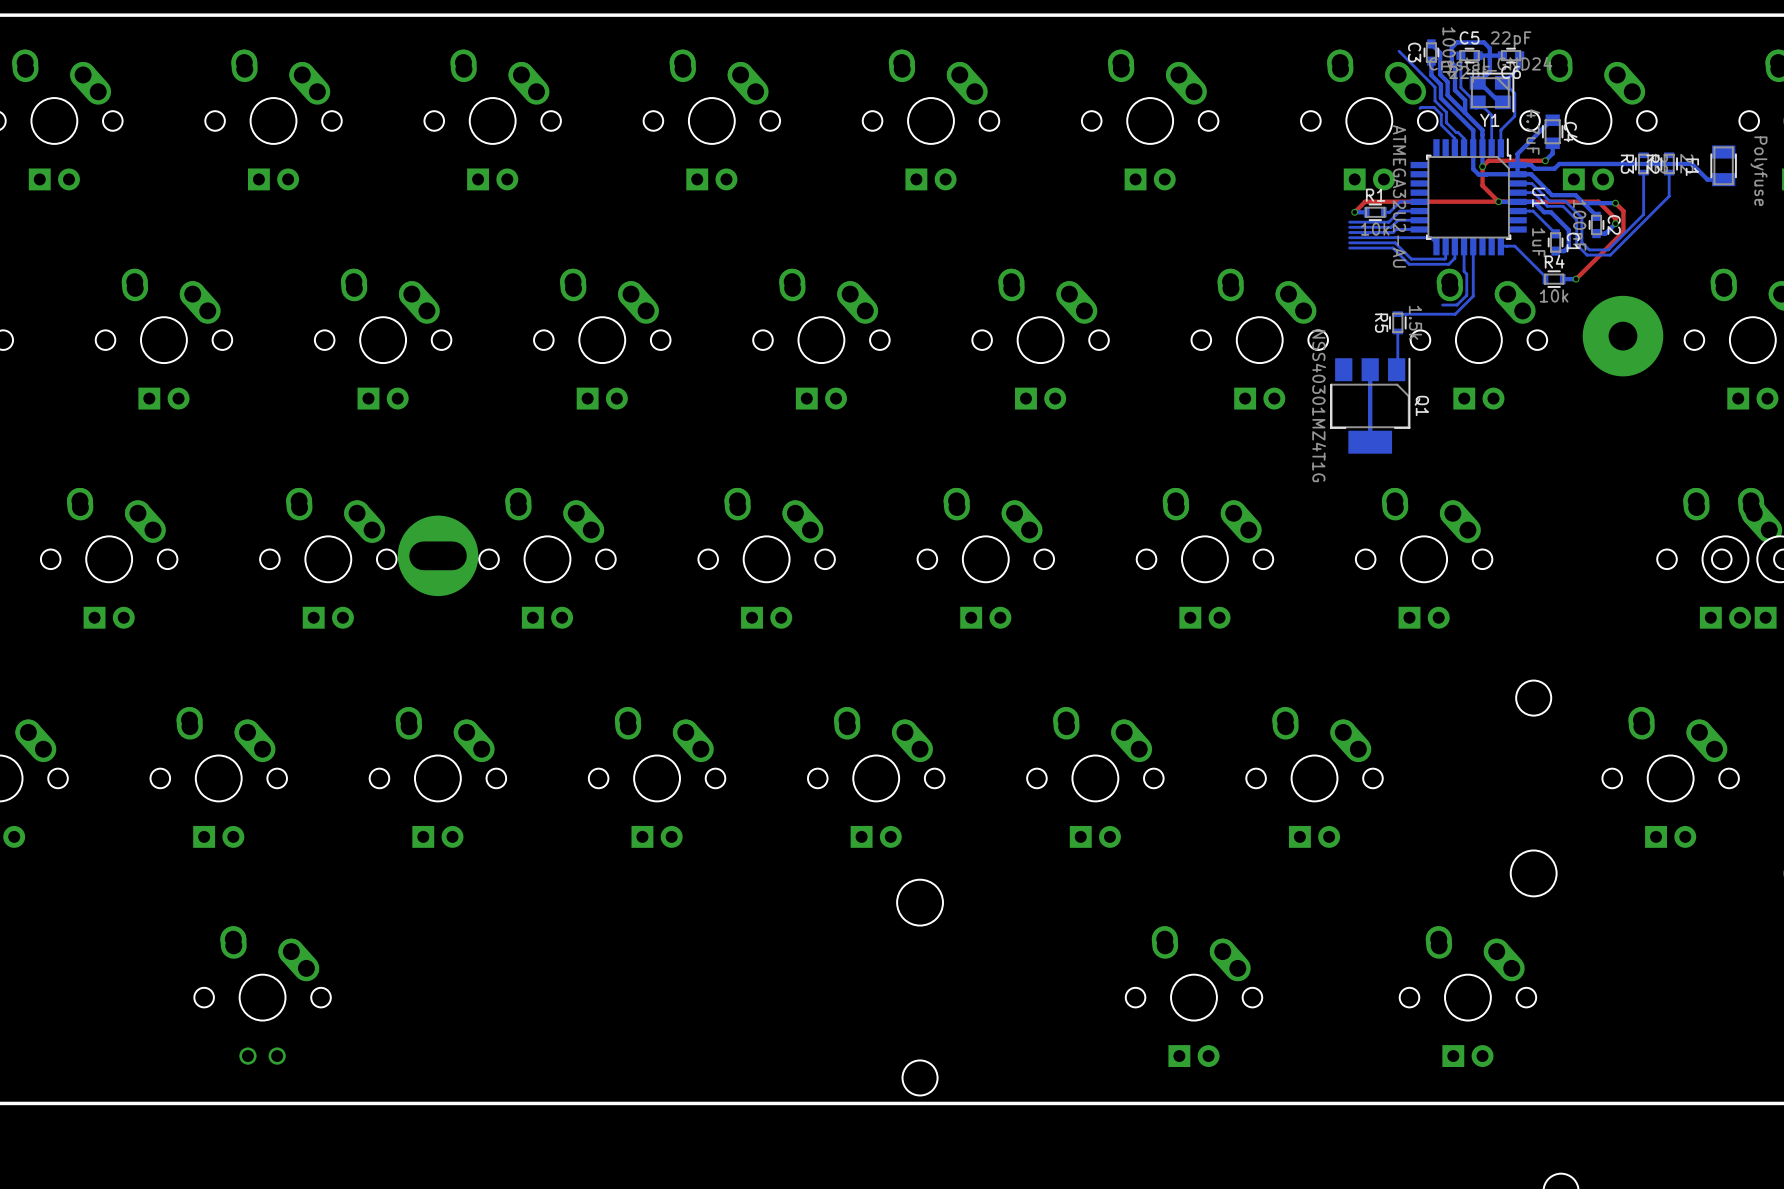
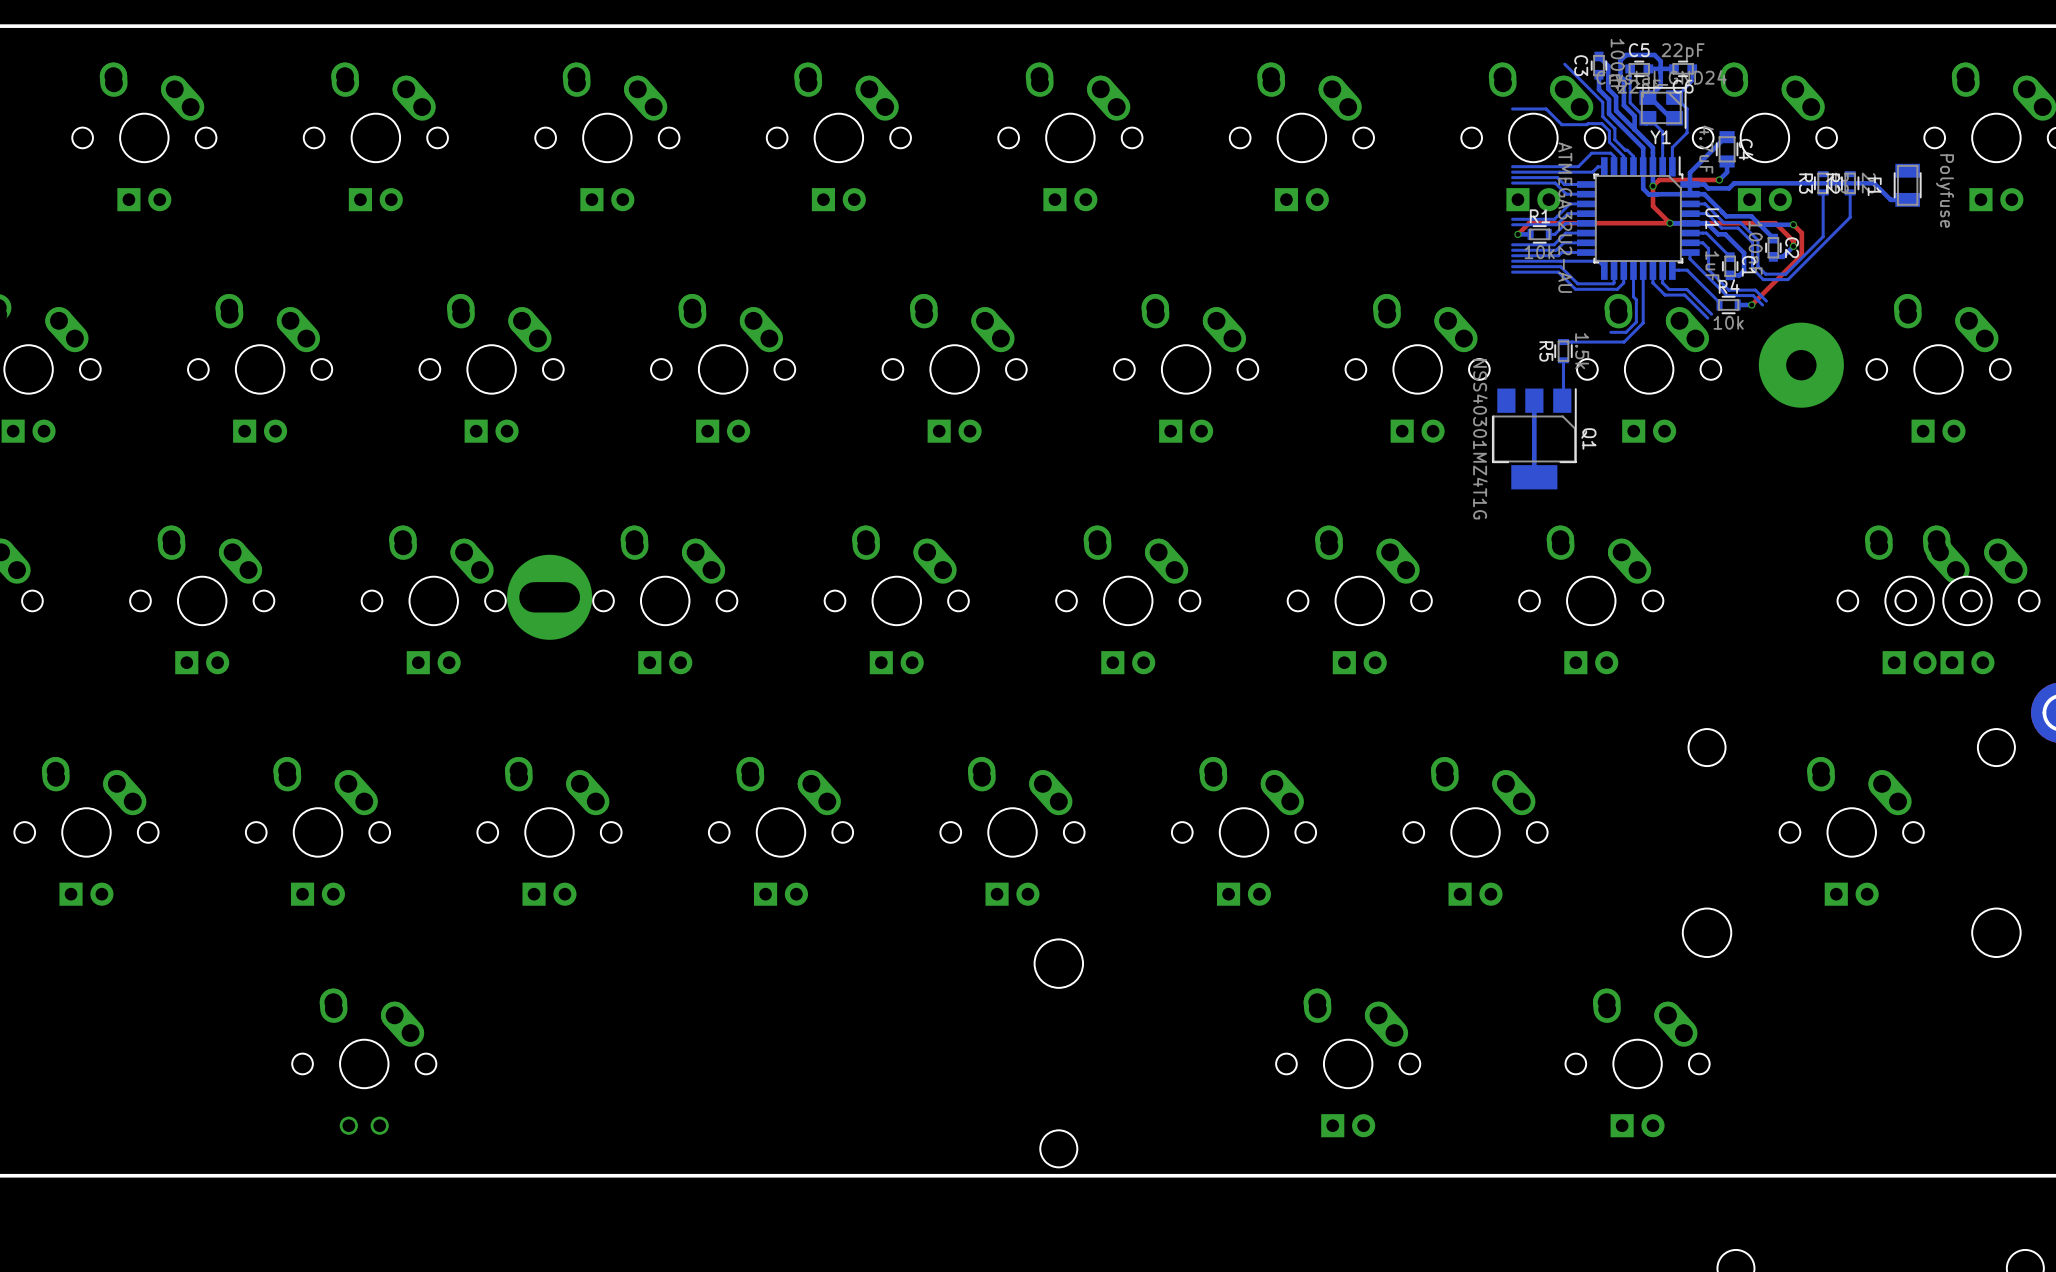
bottom track: none -> (1512, 108) (1546, 108) (1561, 124) (1586, 124)
bottom track: none -> (1512, 166) (1578, 166) (1591, 153) (1610, 153) (1614, 156) (1614, 166)
bottom track: none -> (1604, 166) (1597, 166) (1592, 172) (1512, 172)
bottom track: none -> (1512, 177) (1557, 177) (1564, 184) (1586, 184)
bottom track: none -> (1512, 183) (1555, 183) (1566, 194) (1586, 194)
bottom track: none -> (1586, 203) (1569, 203) (1554, 219) (1512, 219)
bottom track: none -> (1586, 213) (1567, 213) (1556, 224) (1512, 224)
bottom track: none -> (1689, 242) (1702, 242) (1708, 248) (1708, 269) (1728, 290) (1755, 290) (1766, 301)
bottom track: none -> (1689, 252) (1689, 258) (1726, 295) (1753, 295) (1762, 305)
bottom track: none -> (1652, 270) (1652, 282) (1665, 295) (1684, 295) (1707, 318)
bottom track: none -> (1662, 270) (1662, 282) (1669, 289) (1686, 289) (1711, 314)

